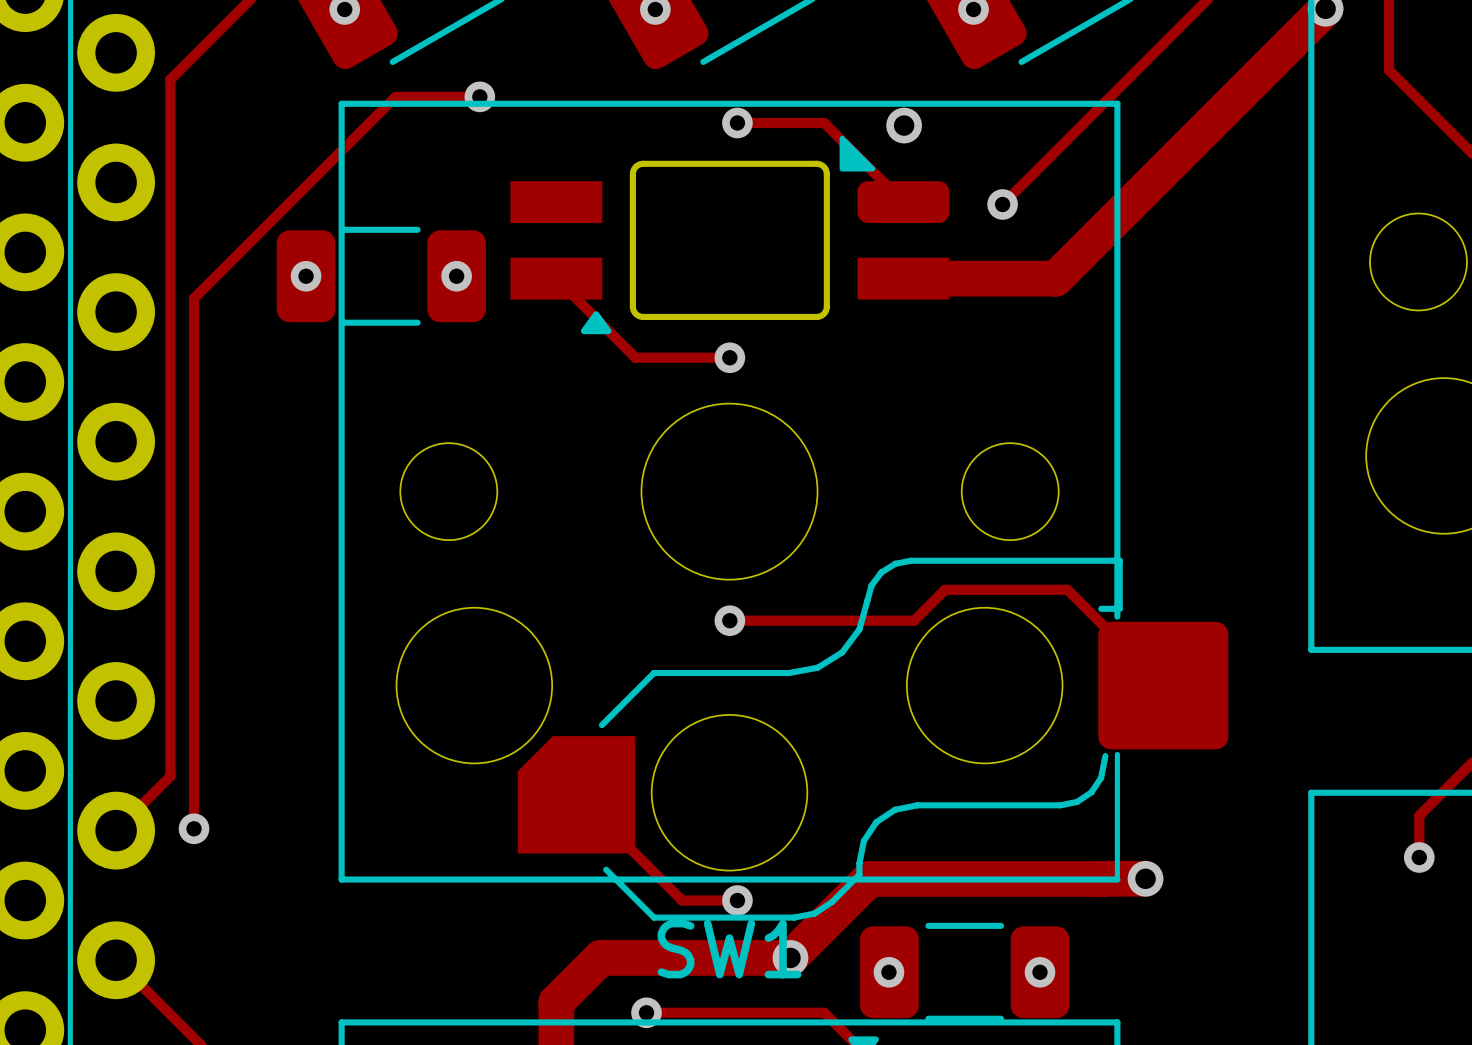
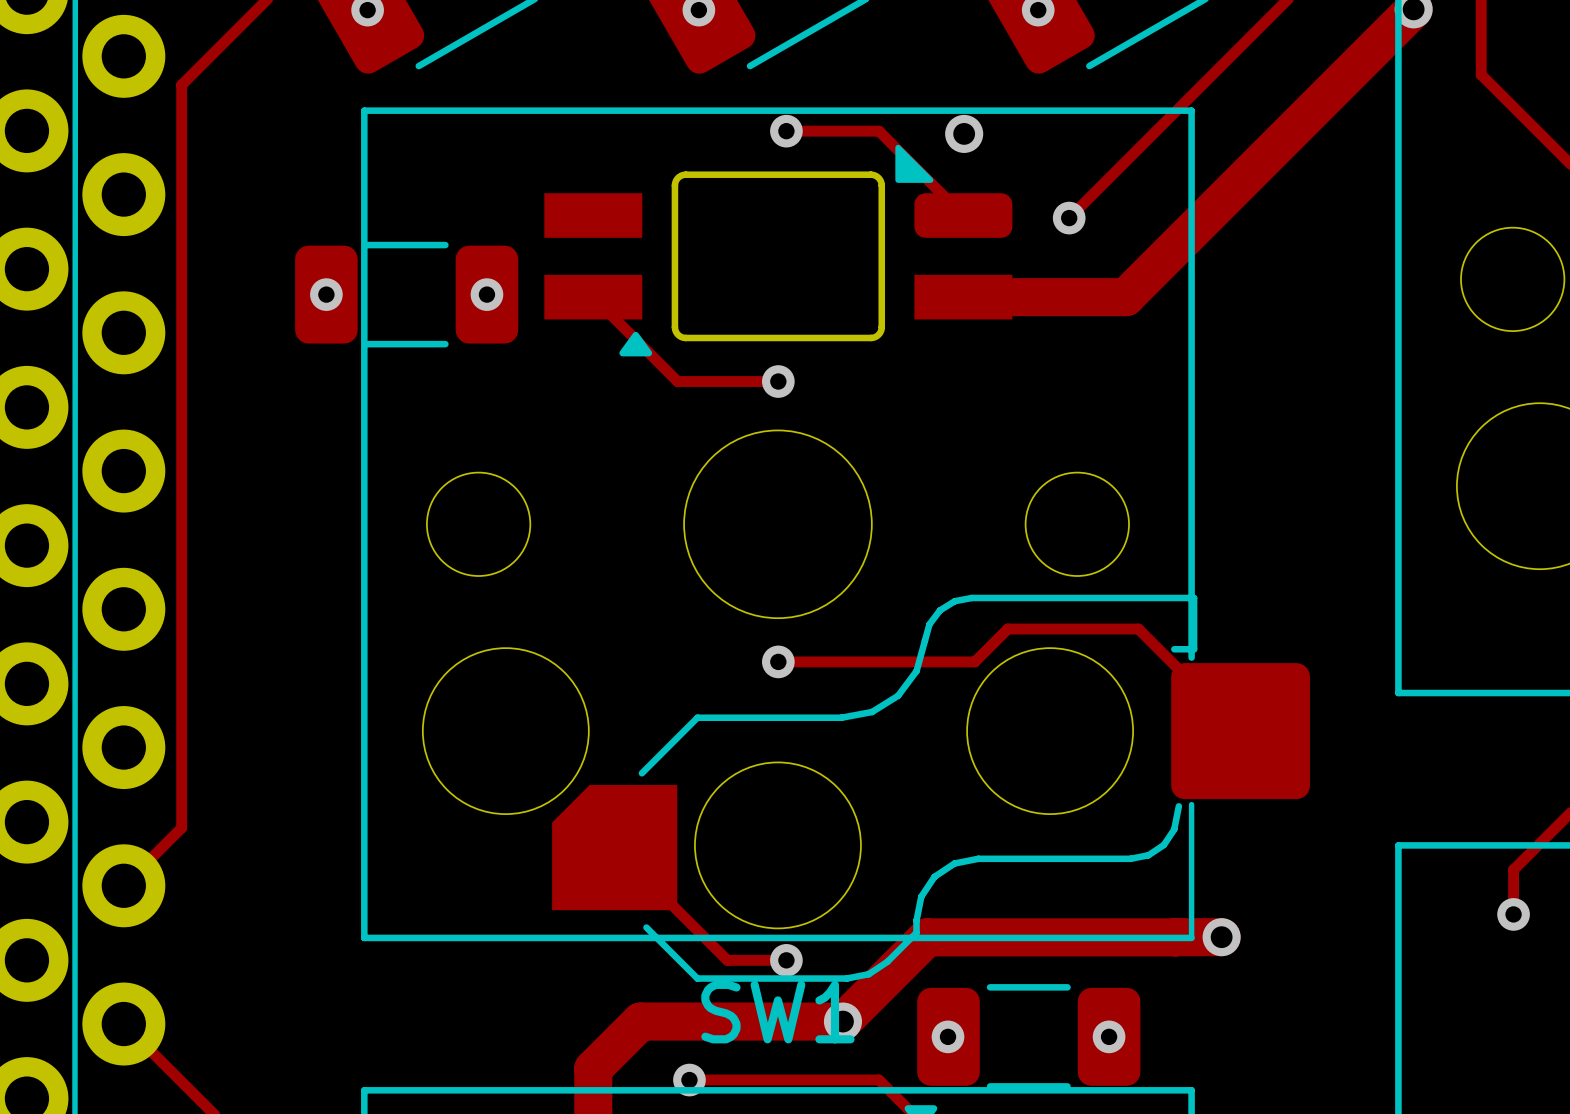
track: (479, 96) (395, 96) (194, 298) (194, 828) -> none
via: (479, 96) -> none
via: (194, 828) -> none

